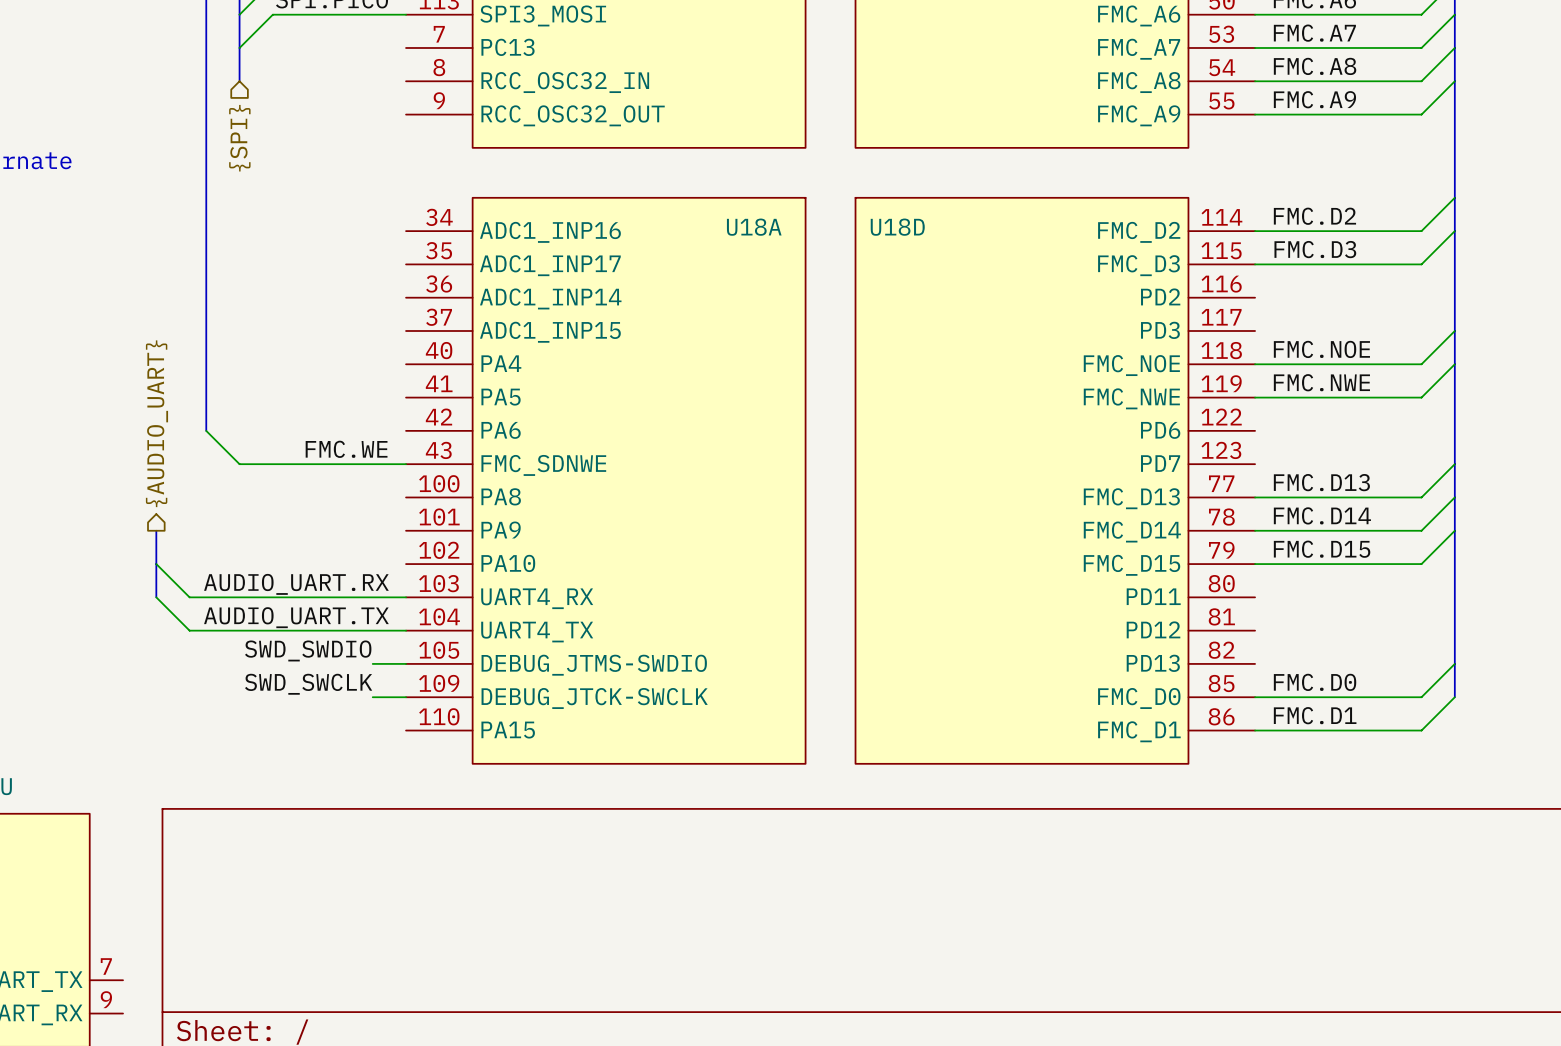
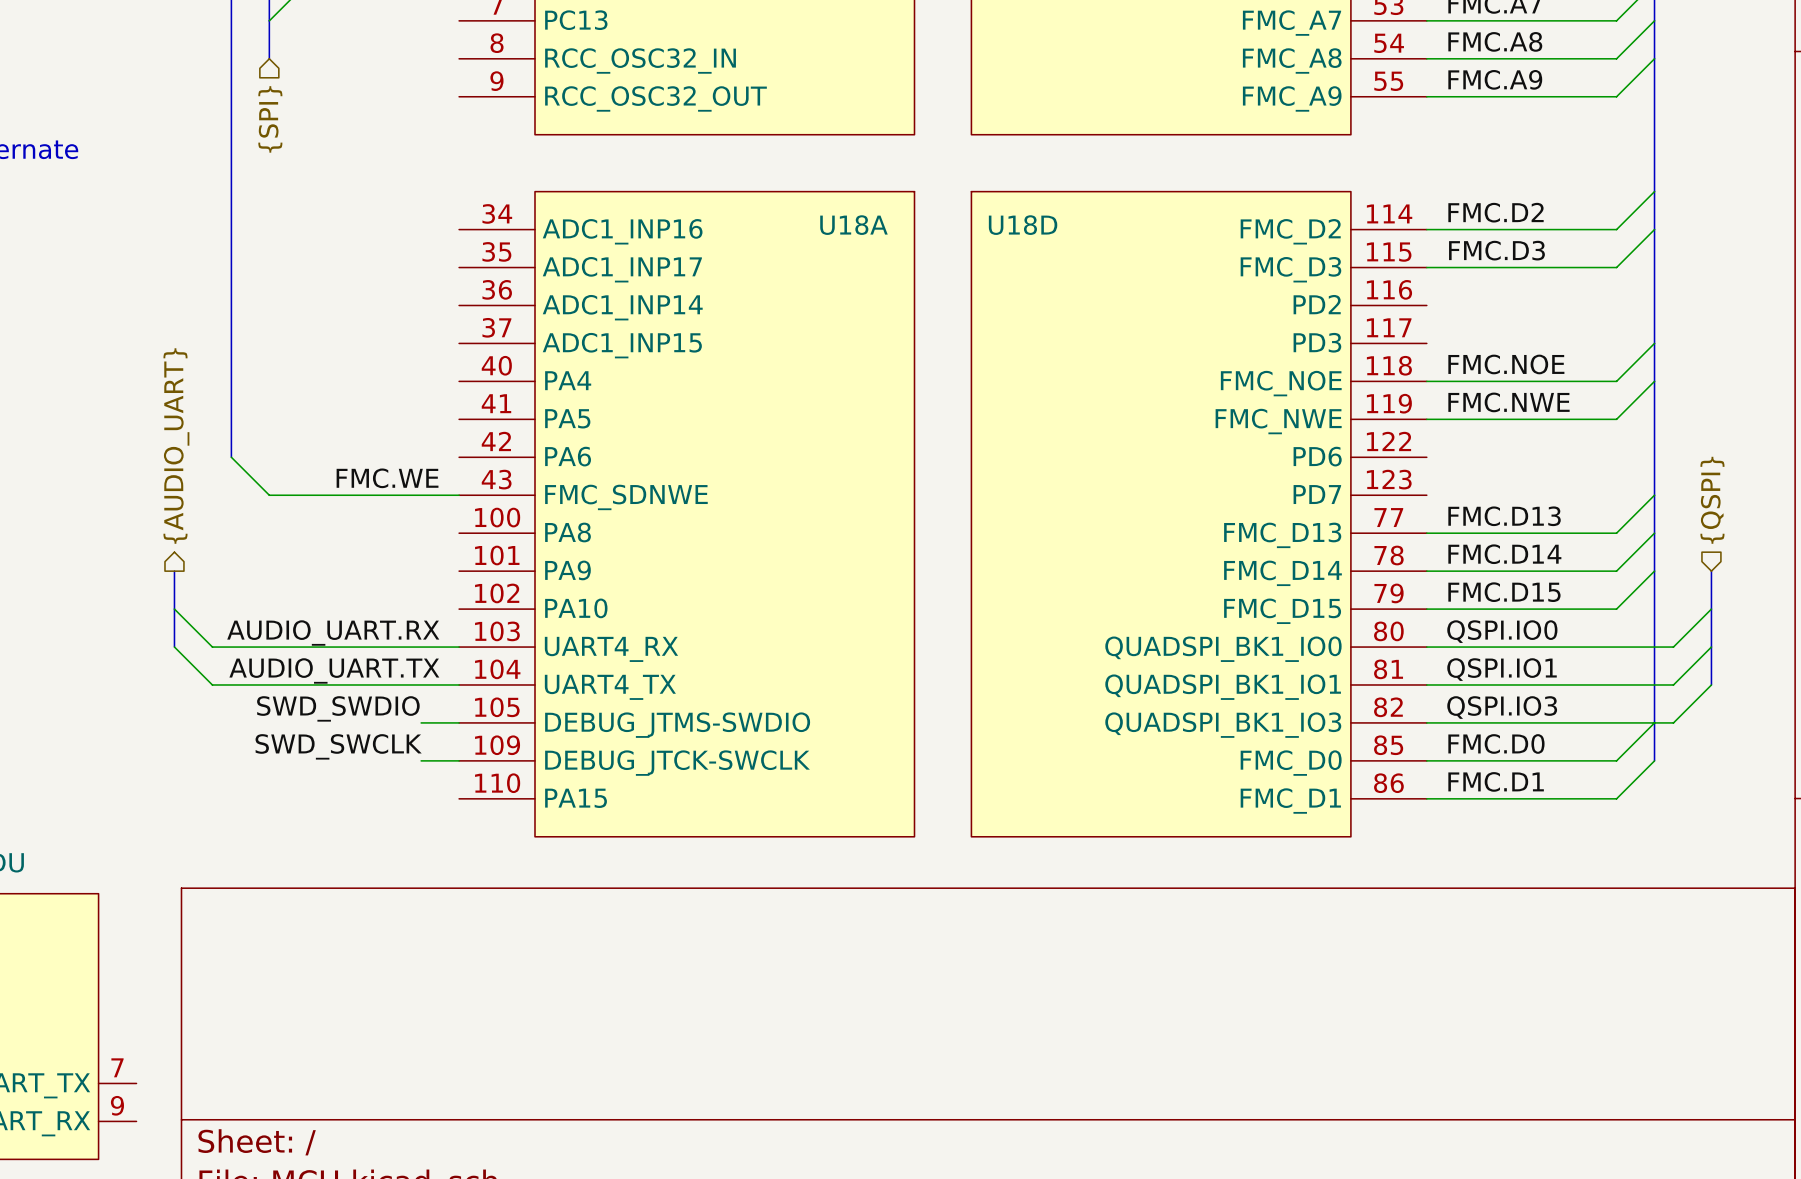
hierarchical label: none -> {QSPI} (1712, 500)
bus: none -> (1711, 571) (1711, 684)
wire: none -> (1711, 609) (1673, 647) (1426, 647)
label: none -> QSPI.IO0 (1502, 631)
U18D pin name: PD11 (1153, 596) -> QUADSPI_BK1_IO0 (1223, 649)
wire: none -> (1711, 647) (1673, 684) (1426, 684)
label: none -> QSPI.IO1 (1502, 669)
U18D pin name: PD12 (1153, 629) -> QUADSPI_BK1_IO1 (1223, 687)
wire: none -> (1711, 684) (1673, 722) (1426, 722)
label: none -> QSPI.IO3 (1502, 707)
U18D pin name: PD13 (1153, 663) -> QUADSPI_BK1_IO3 (1223, 725)

